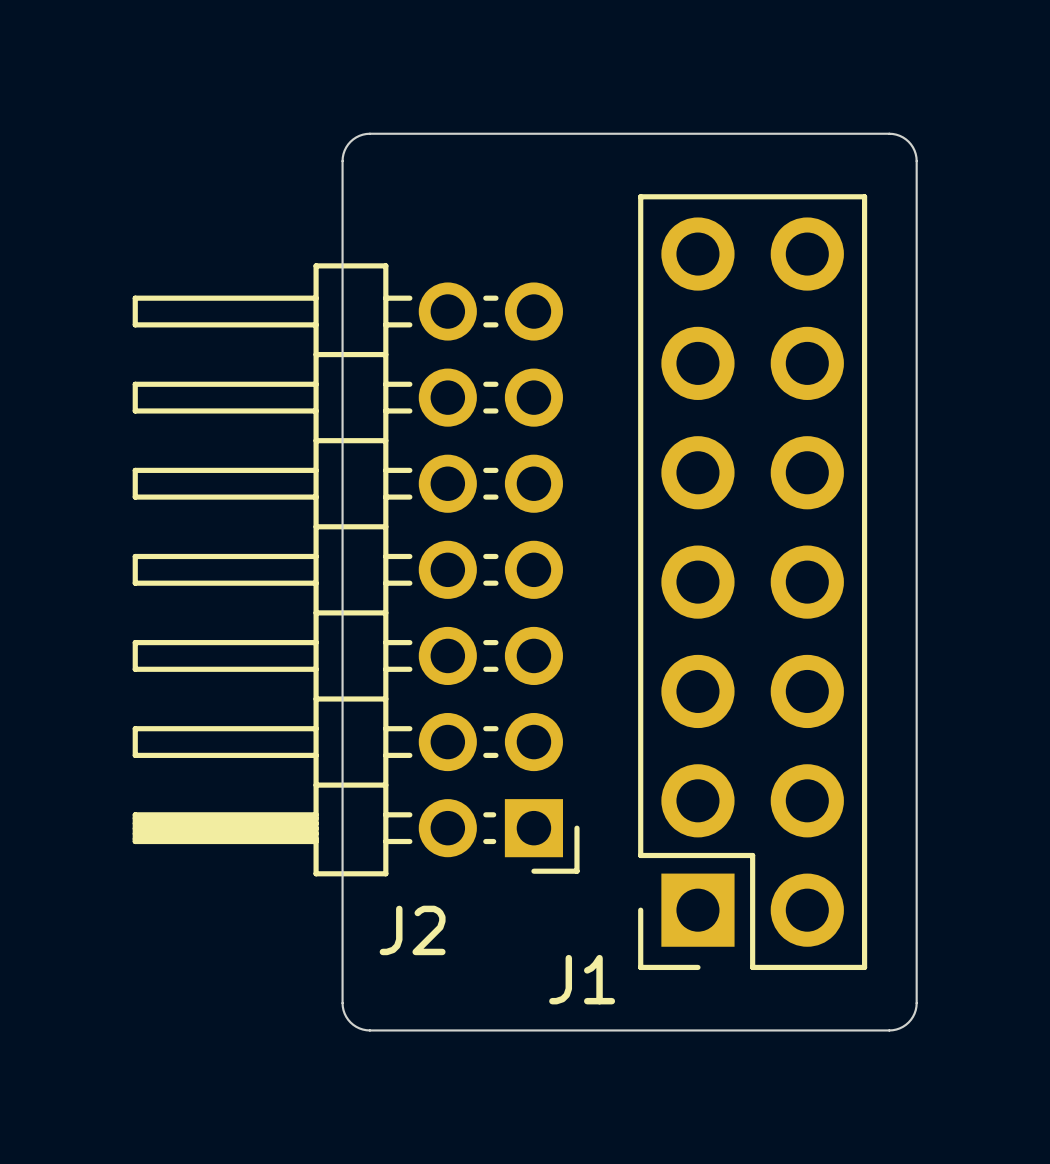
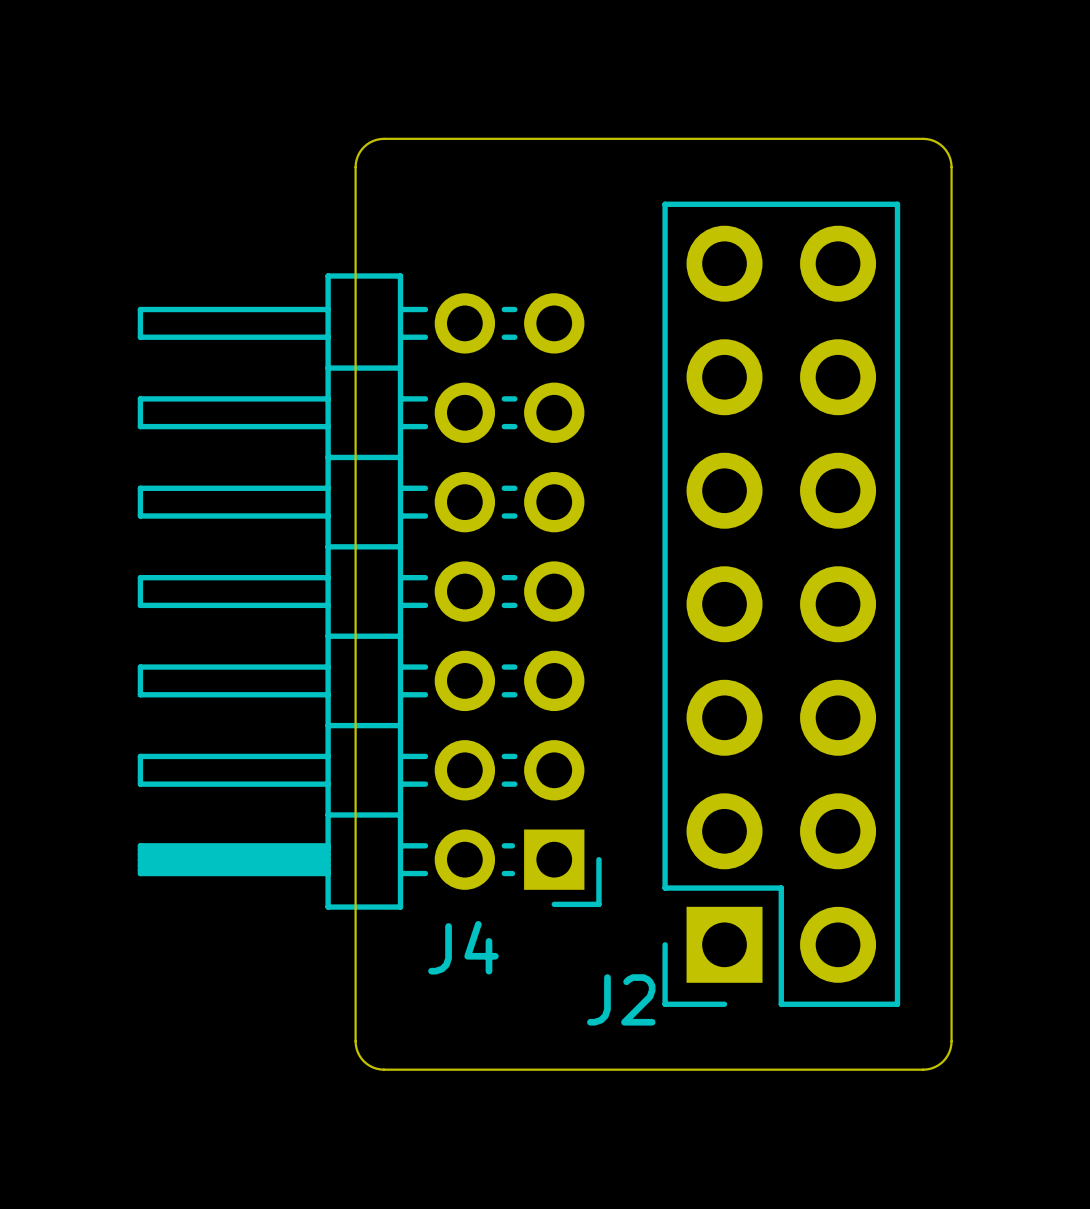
J2 name: J2 (412, 930) -> J4 (463, 947)
J1 name: J1 (582, 979) -> J2 (621, 999)

